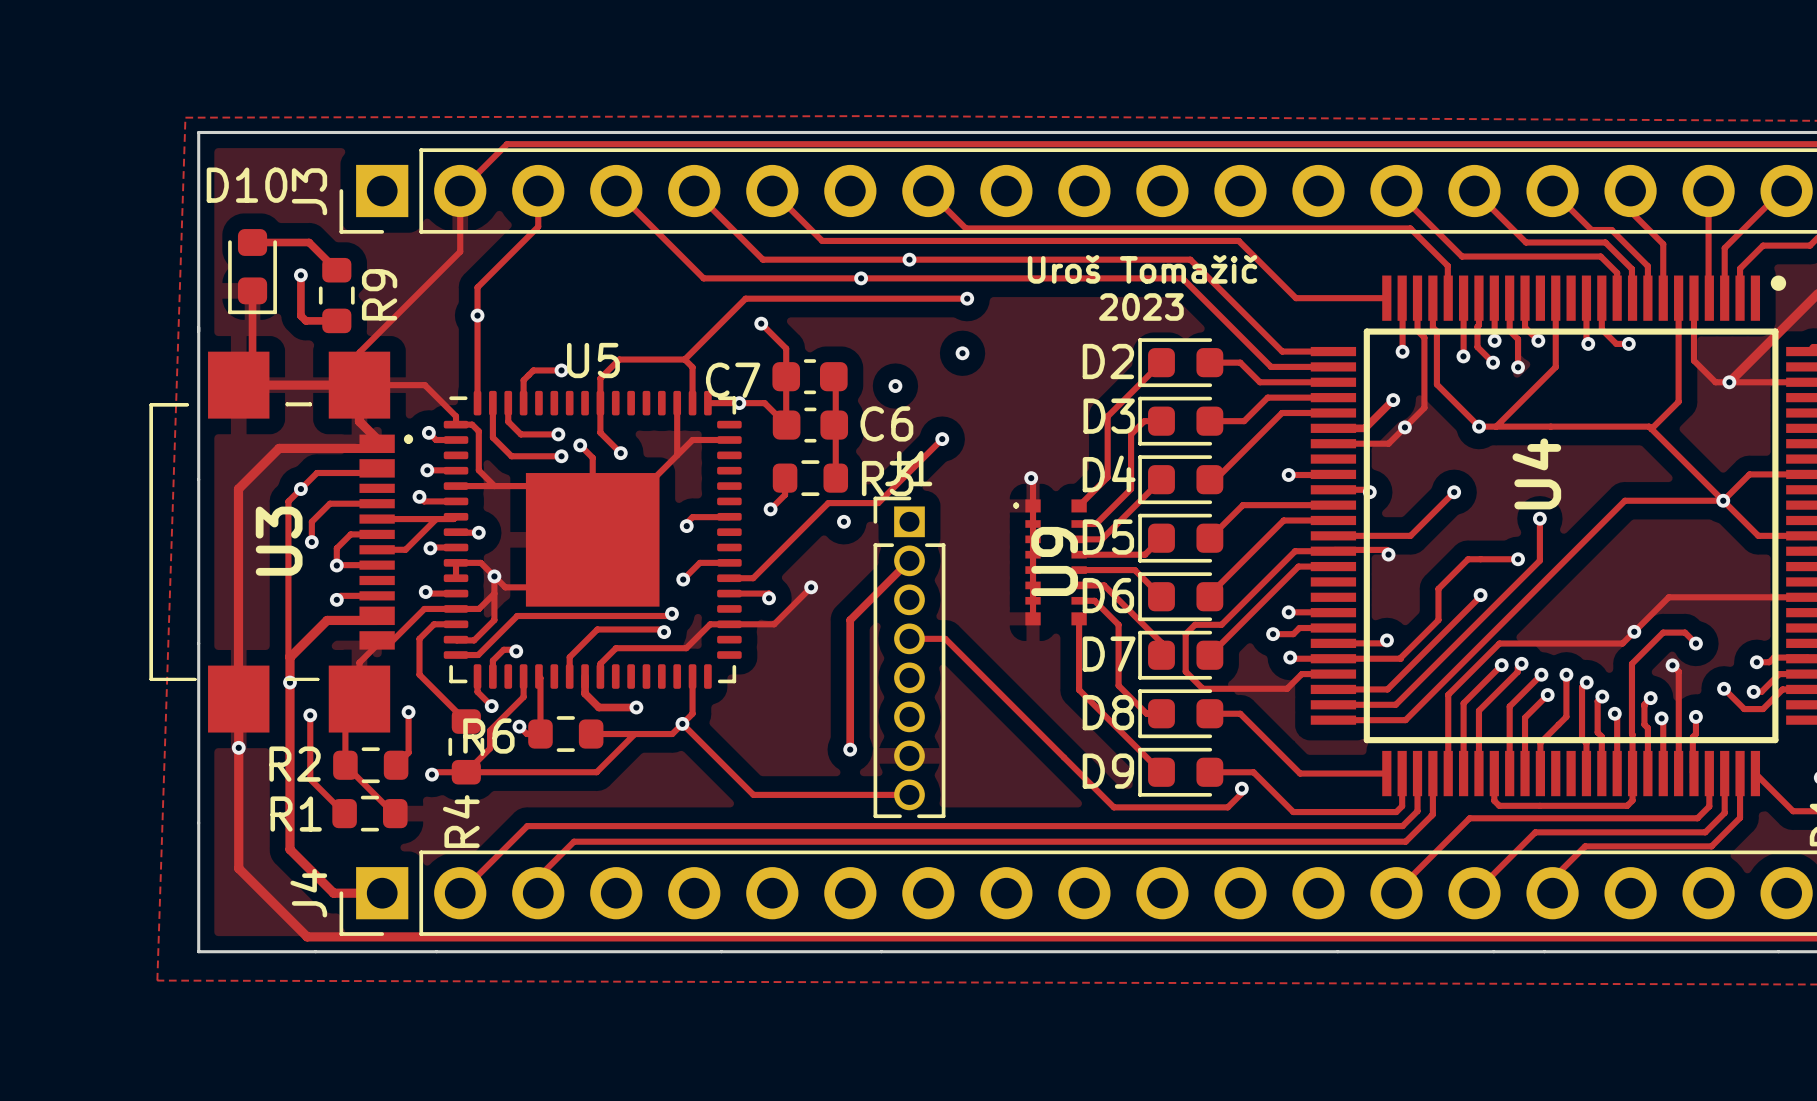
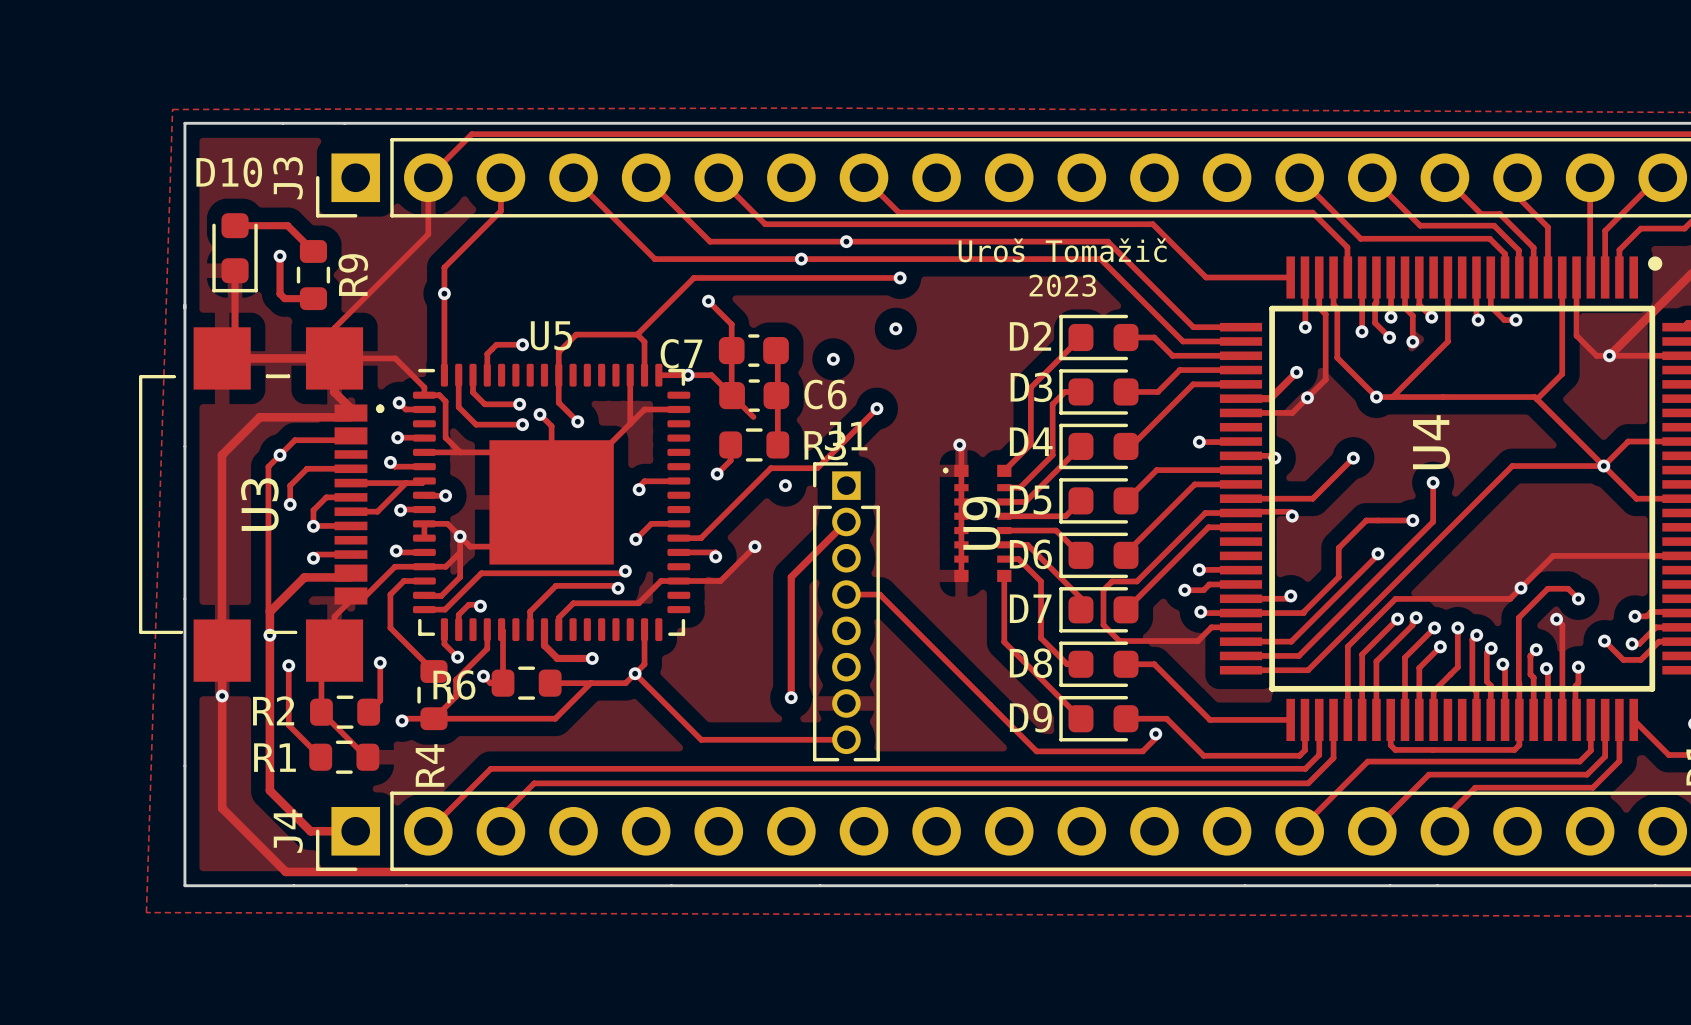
track: none -> (732, 395) (753, 417)

